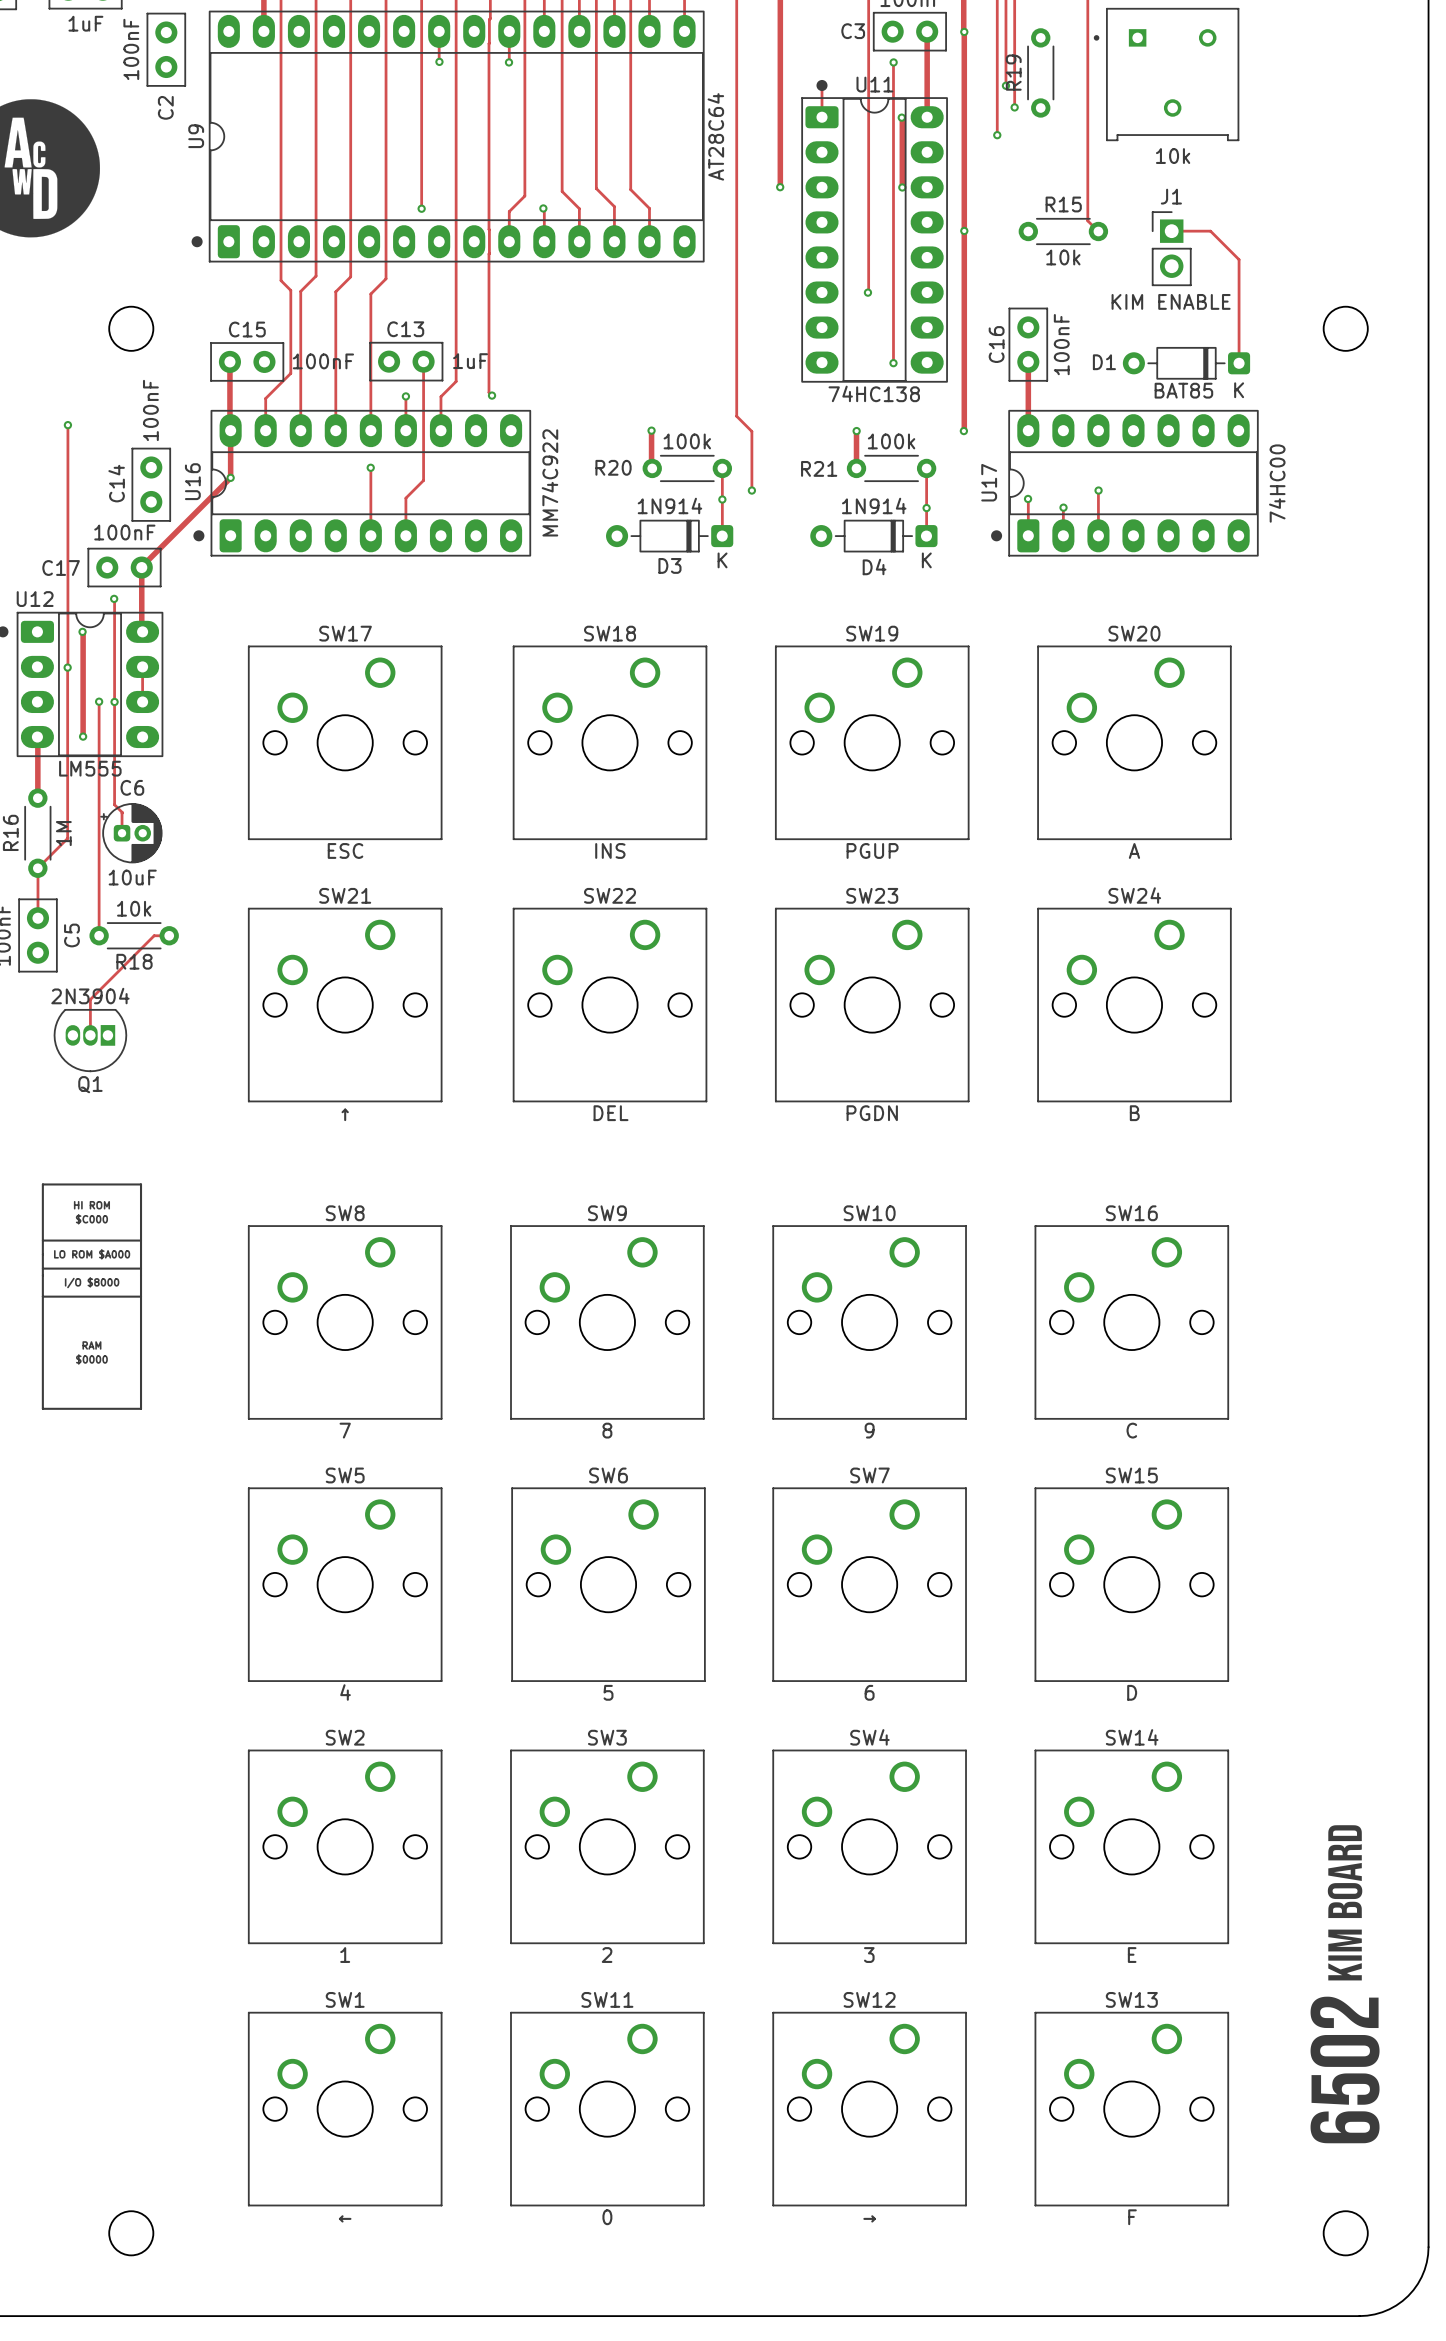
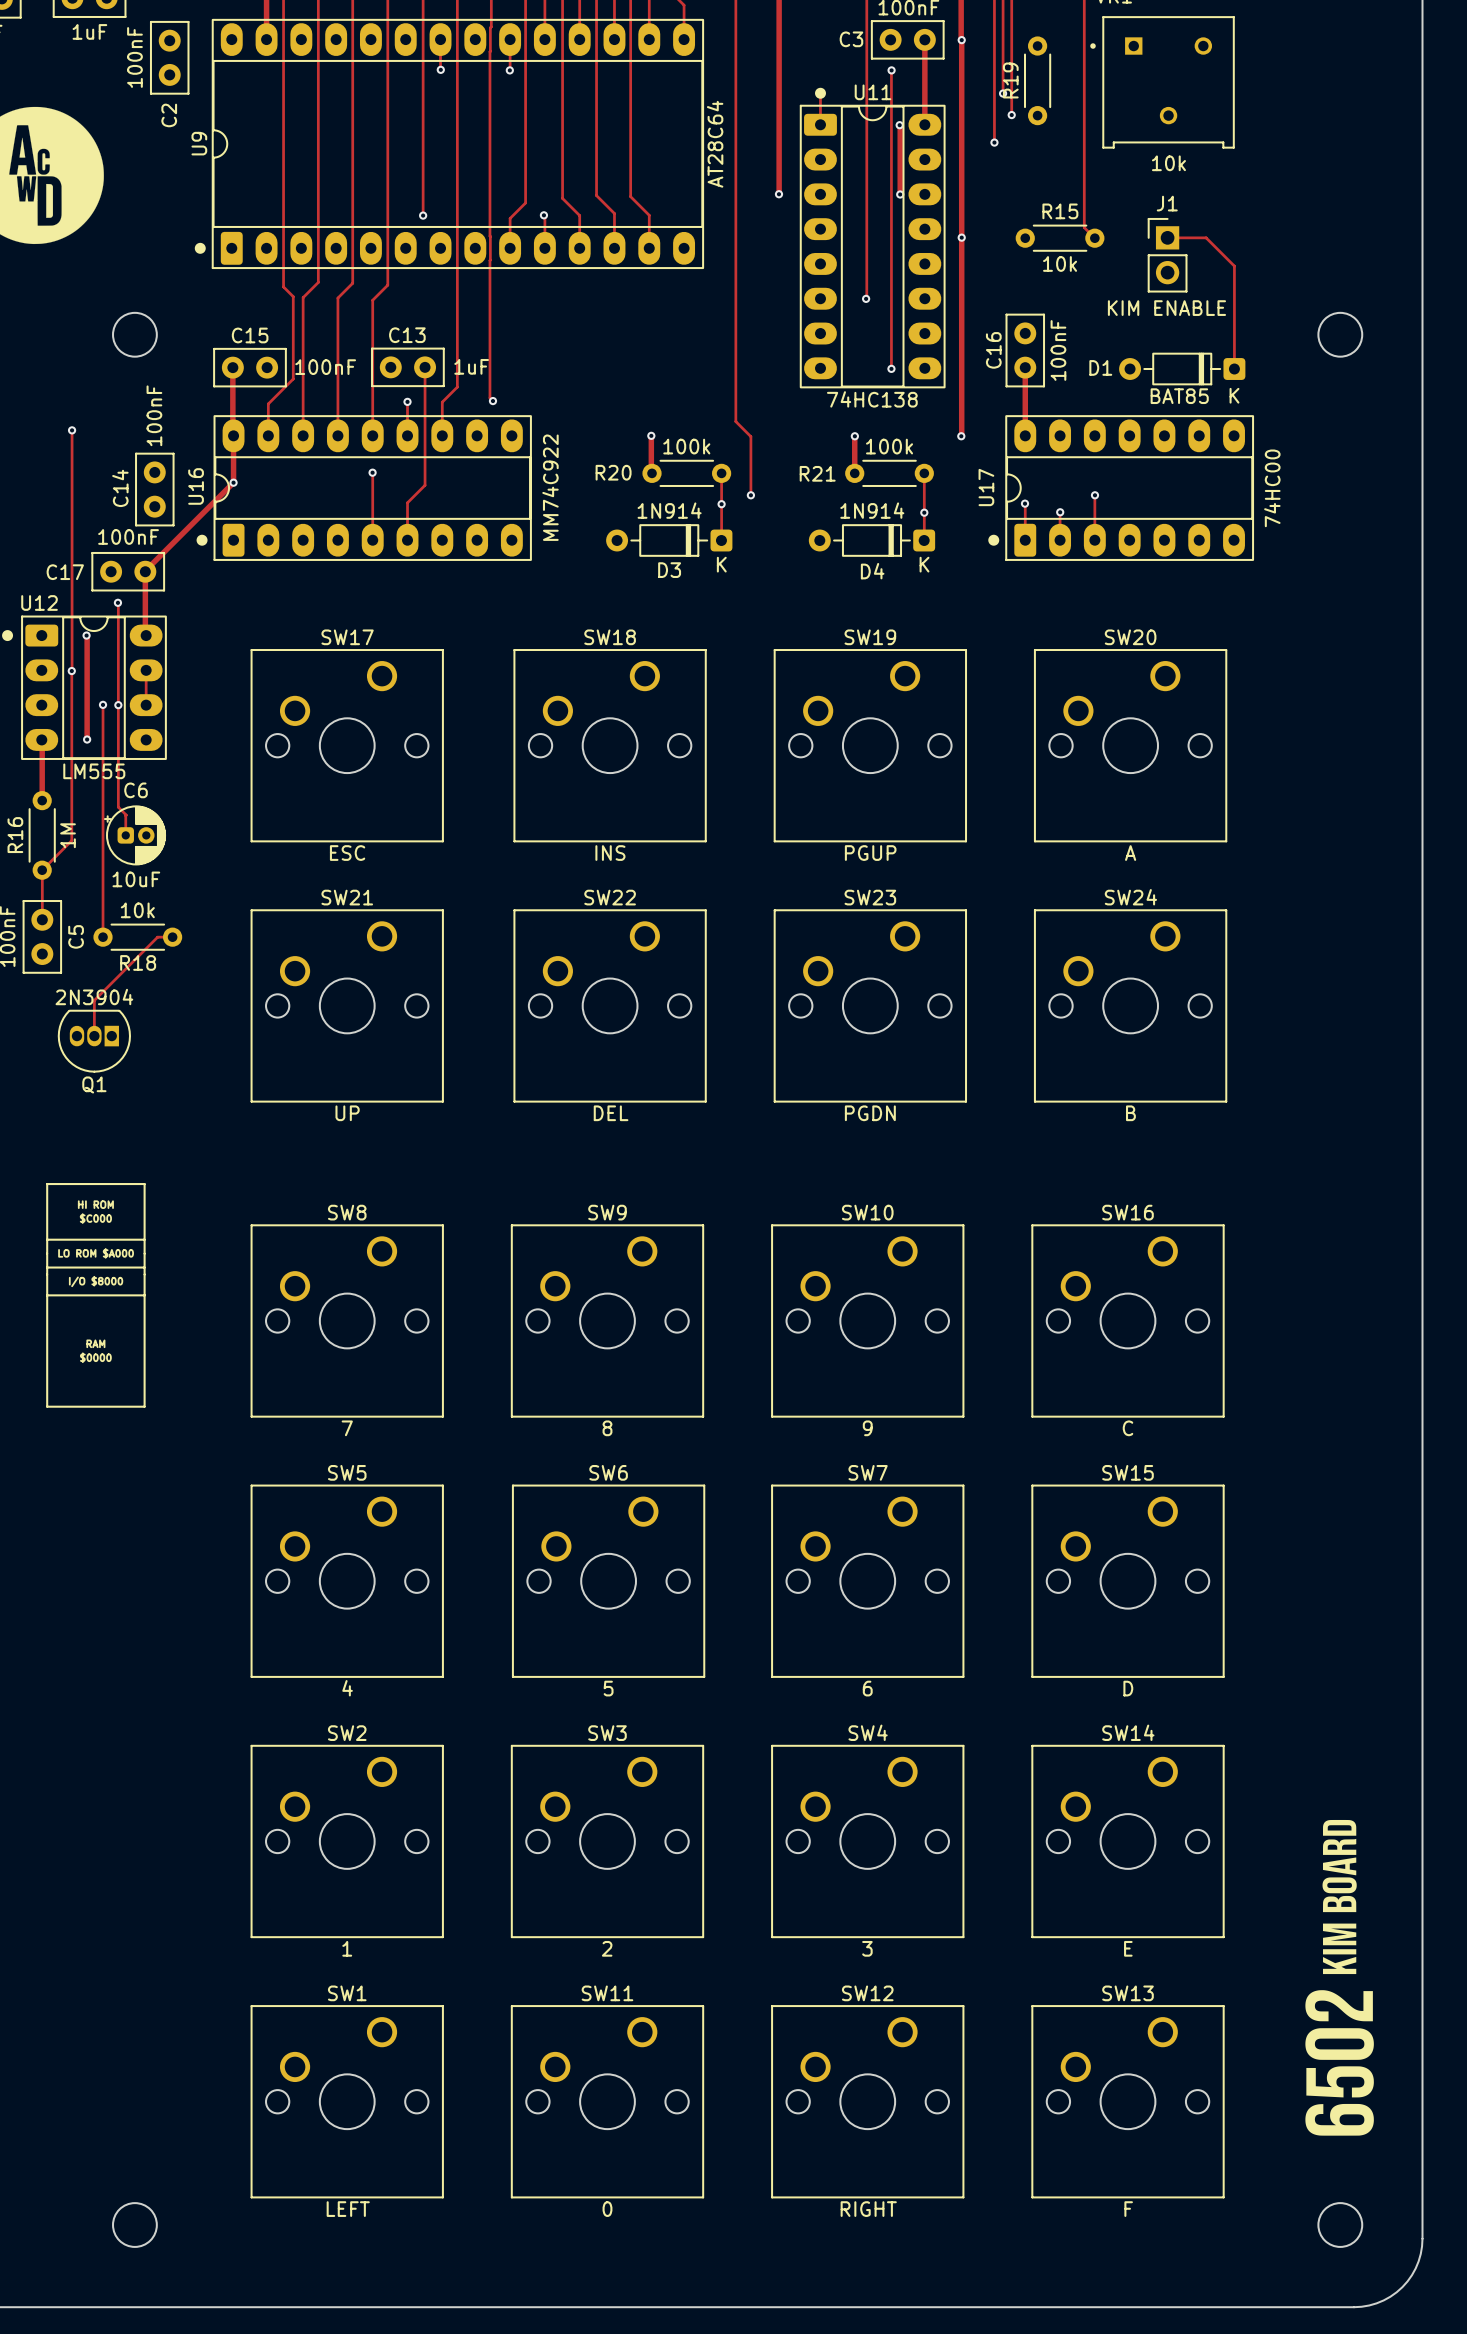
SW21 value: ↑ (345, 1114) -> UP (347, 1113)
SW1 value: ← (345, 2218) -> LEFT (348, 2209)
SW12 value: → (869, 2218) -> RIGHT (868, 2209)

